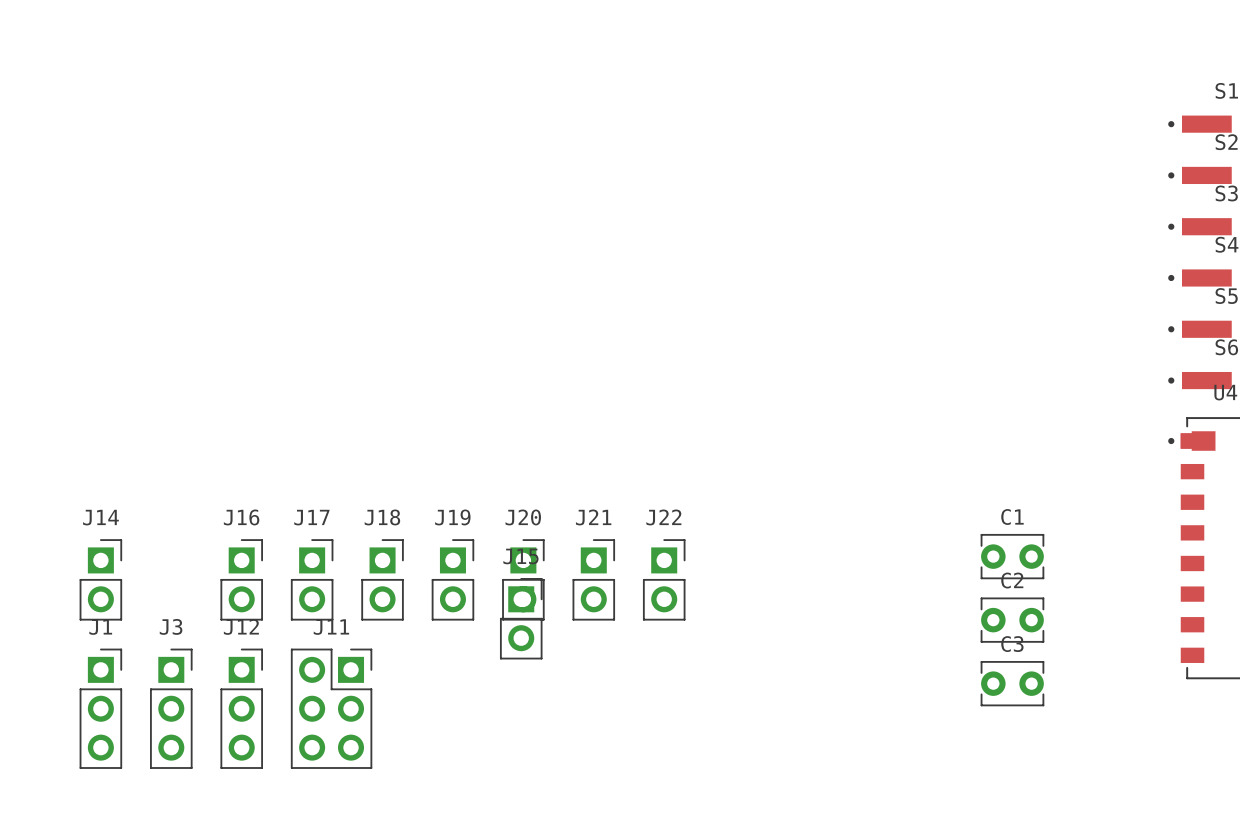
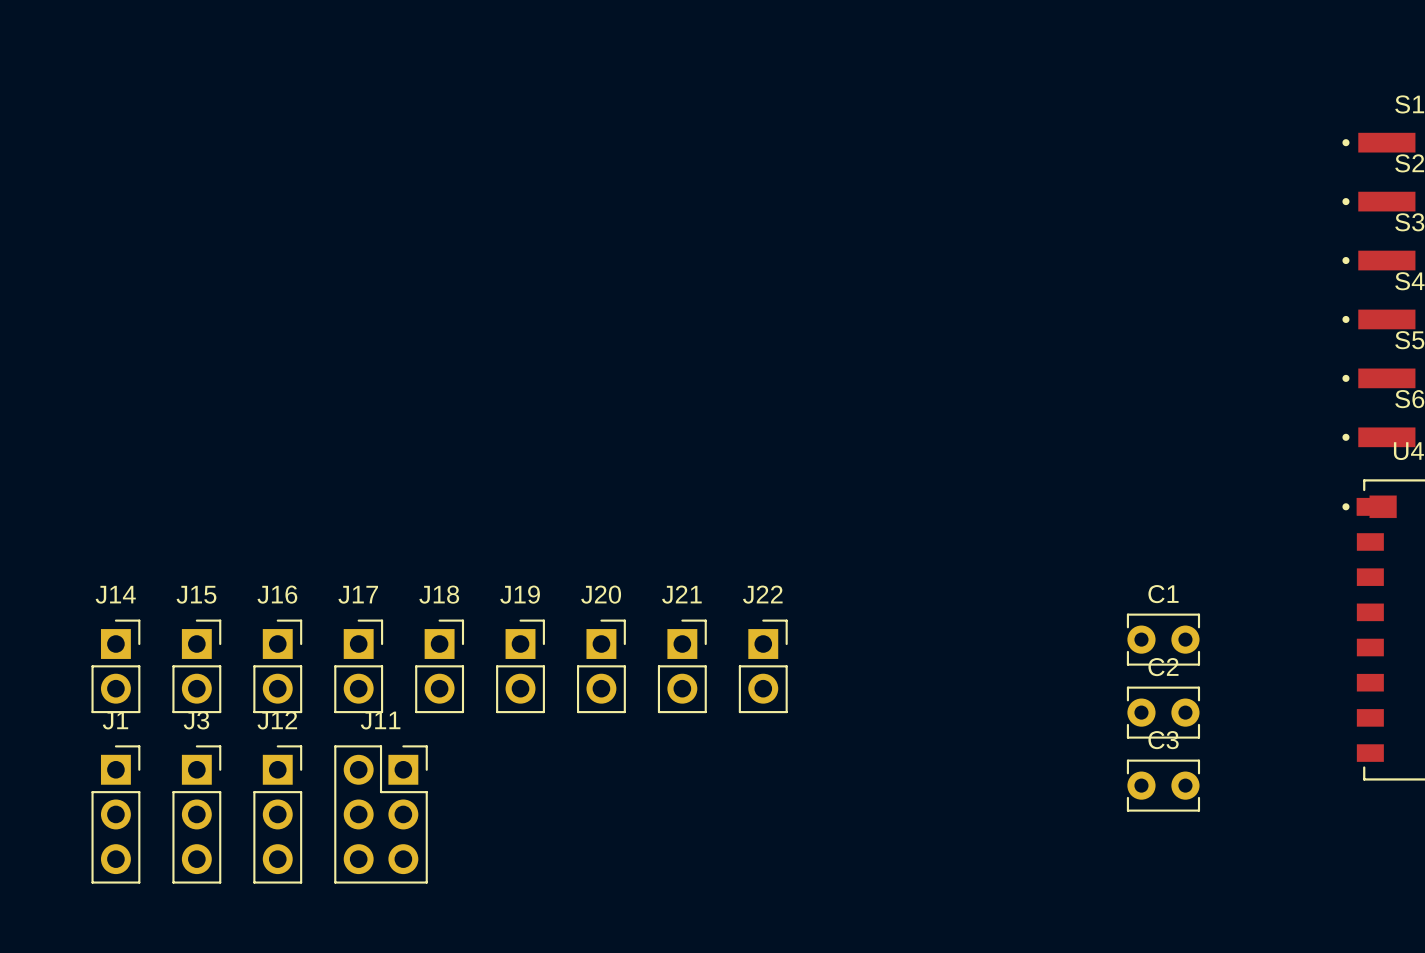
J15 position: (521, 618) -> (196, 666)

